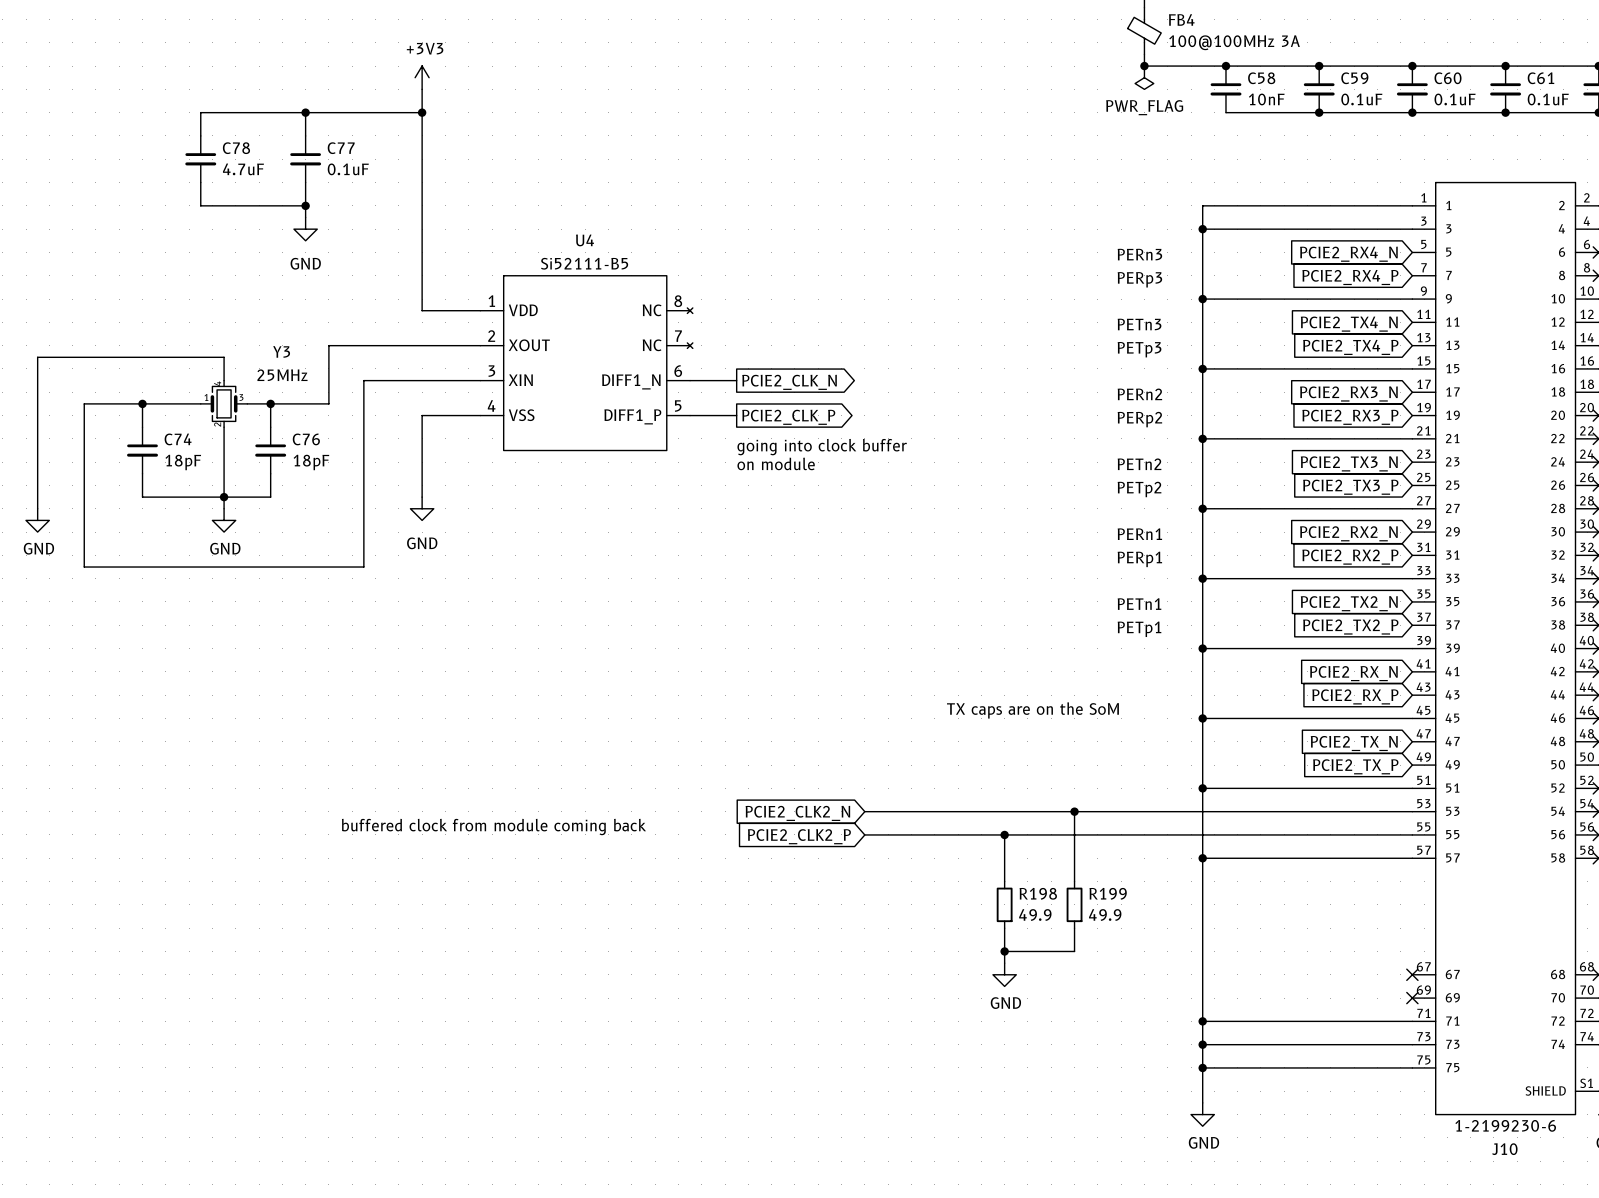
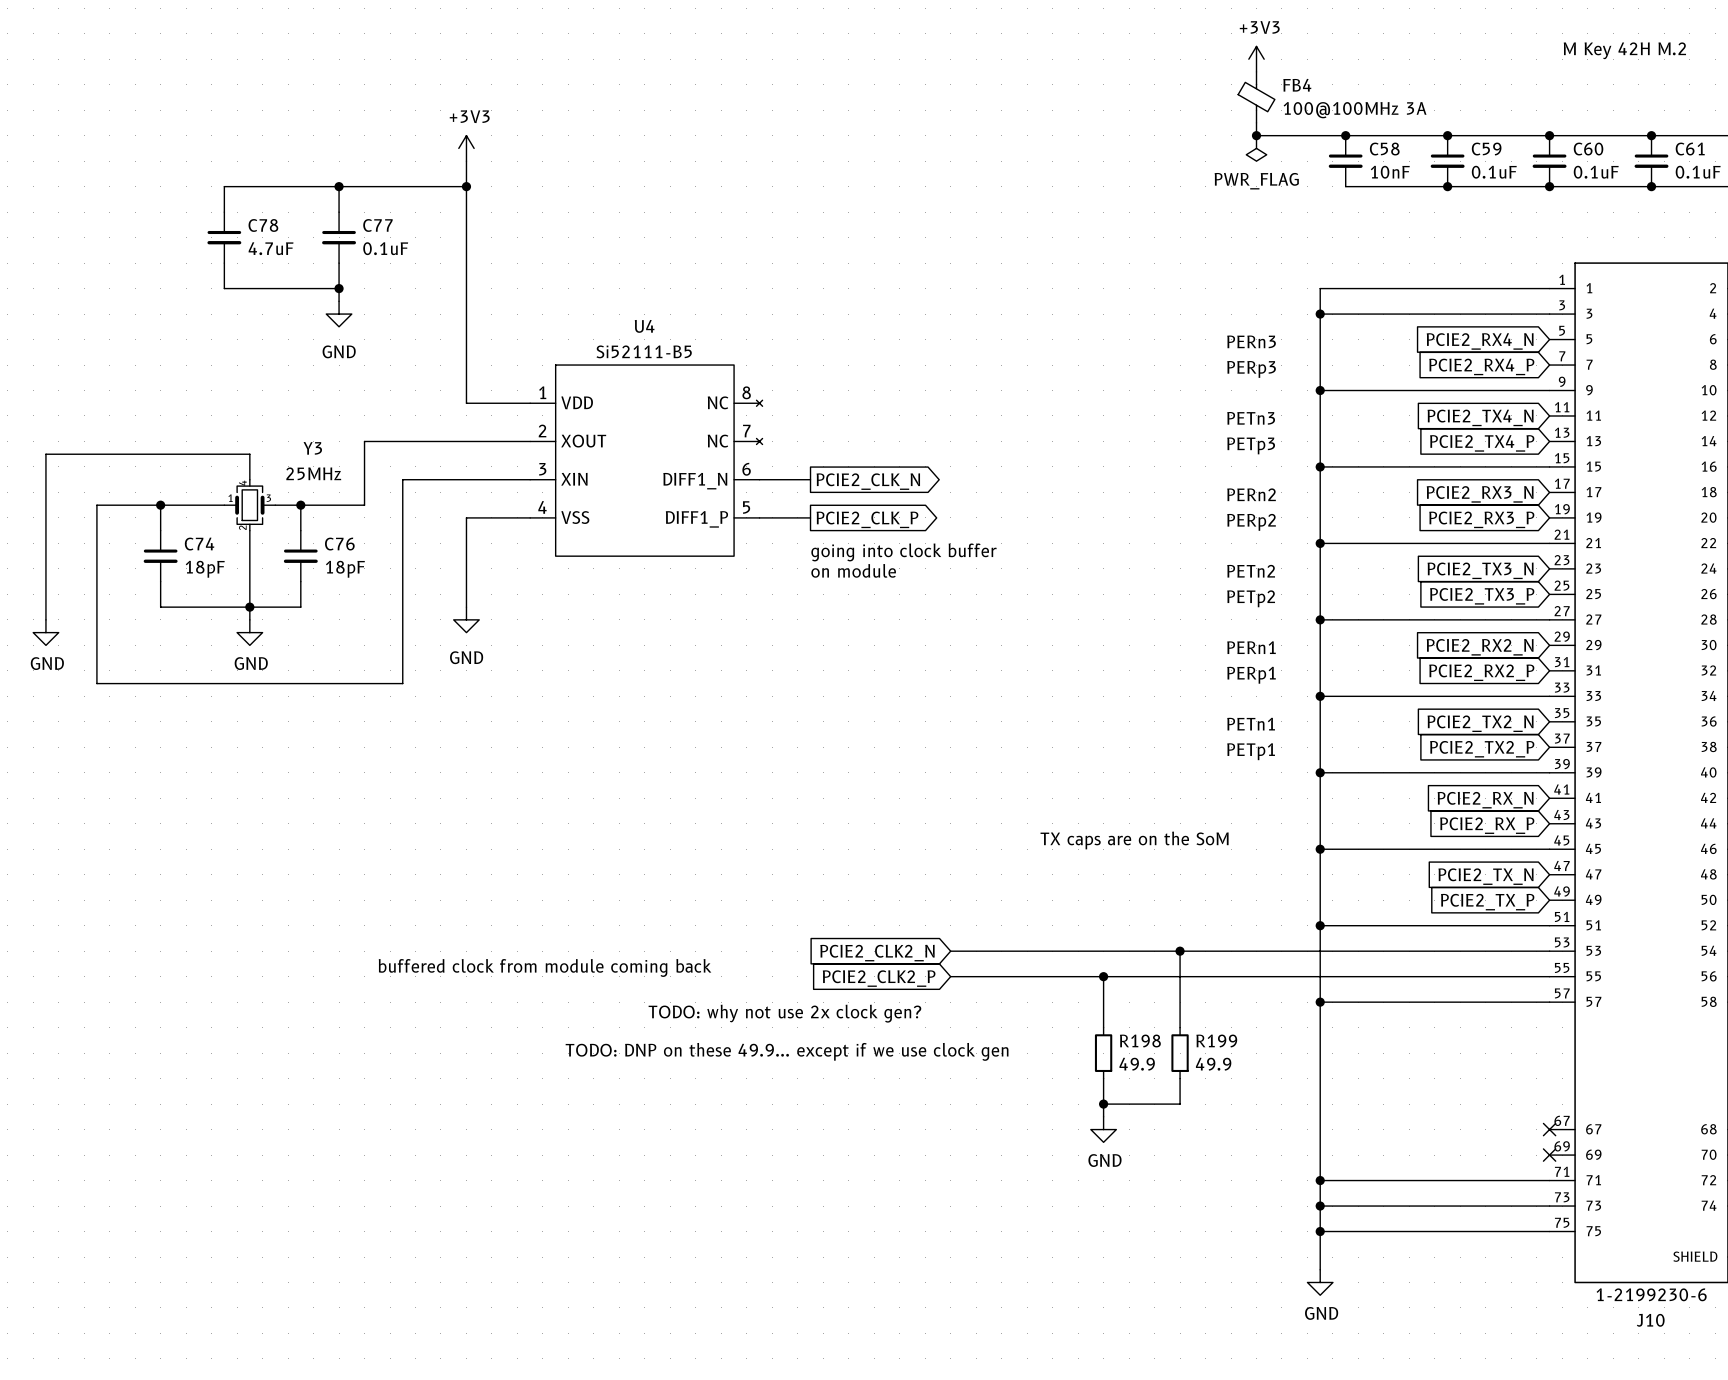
text: none -> TODO: why not use 2x clock gen? (784, 1013)
text: none -> TODO: DNP on these 49.9... except if we use clock gen (787, 1051)

